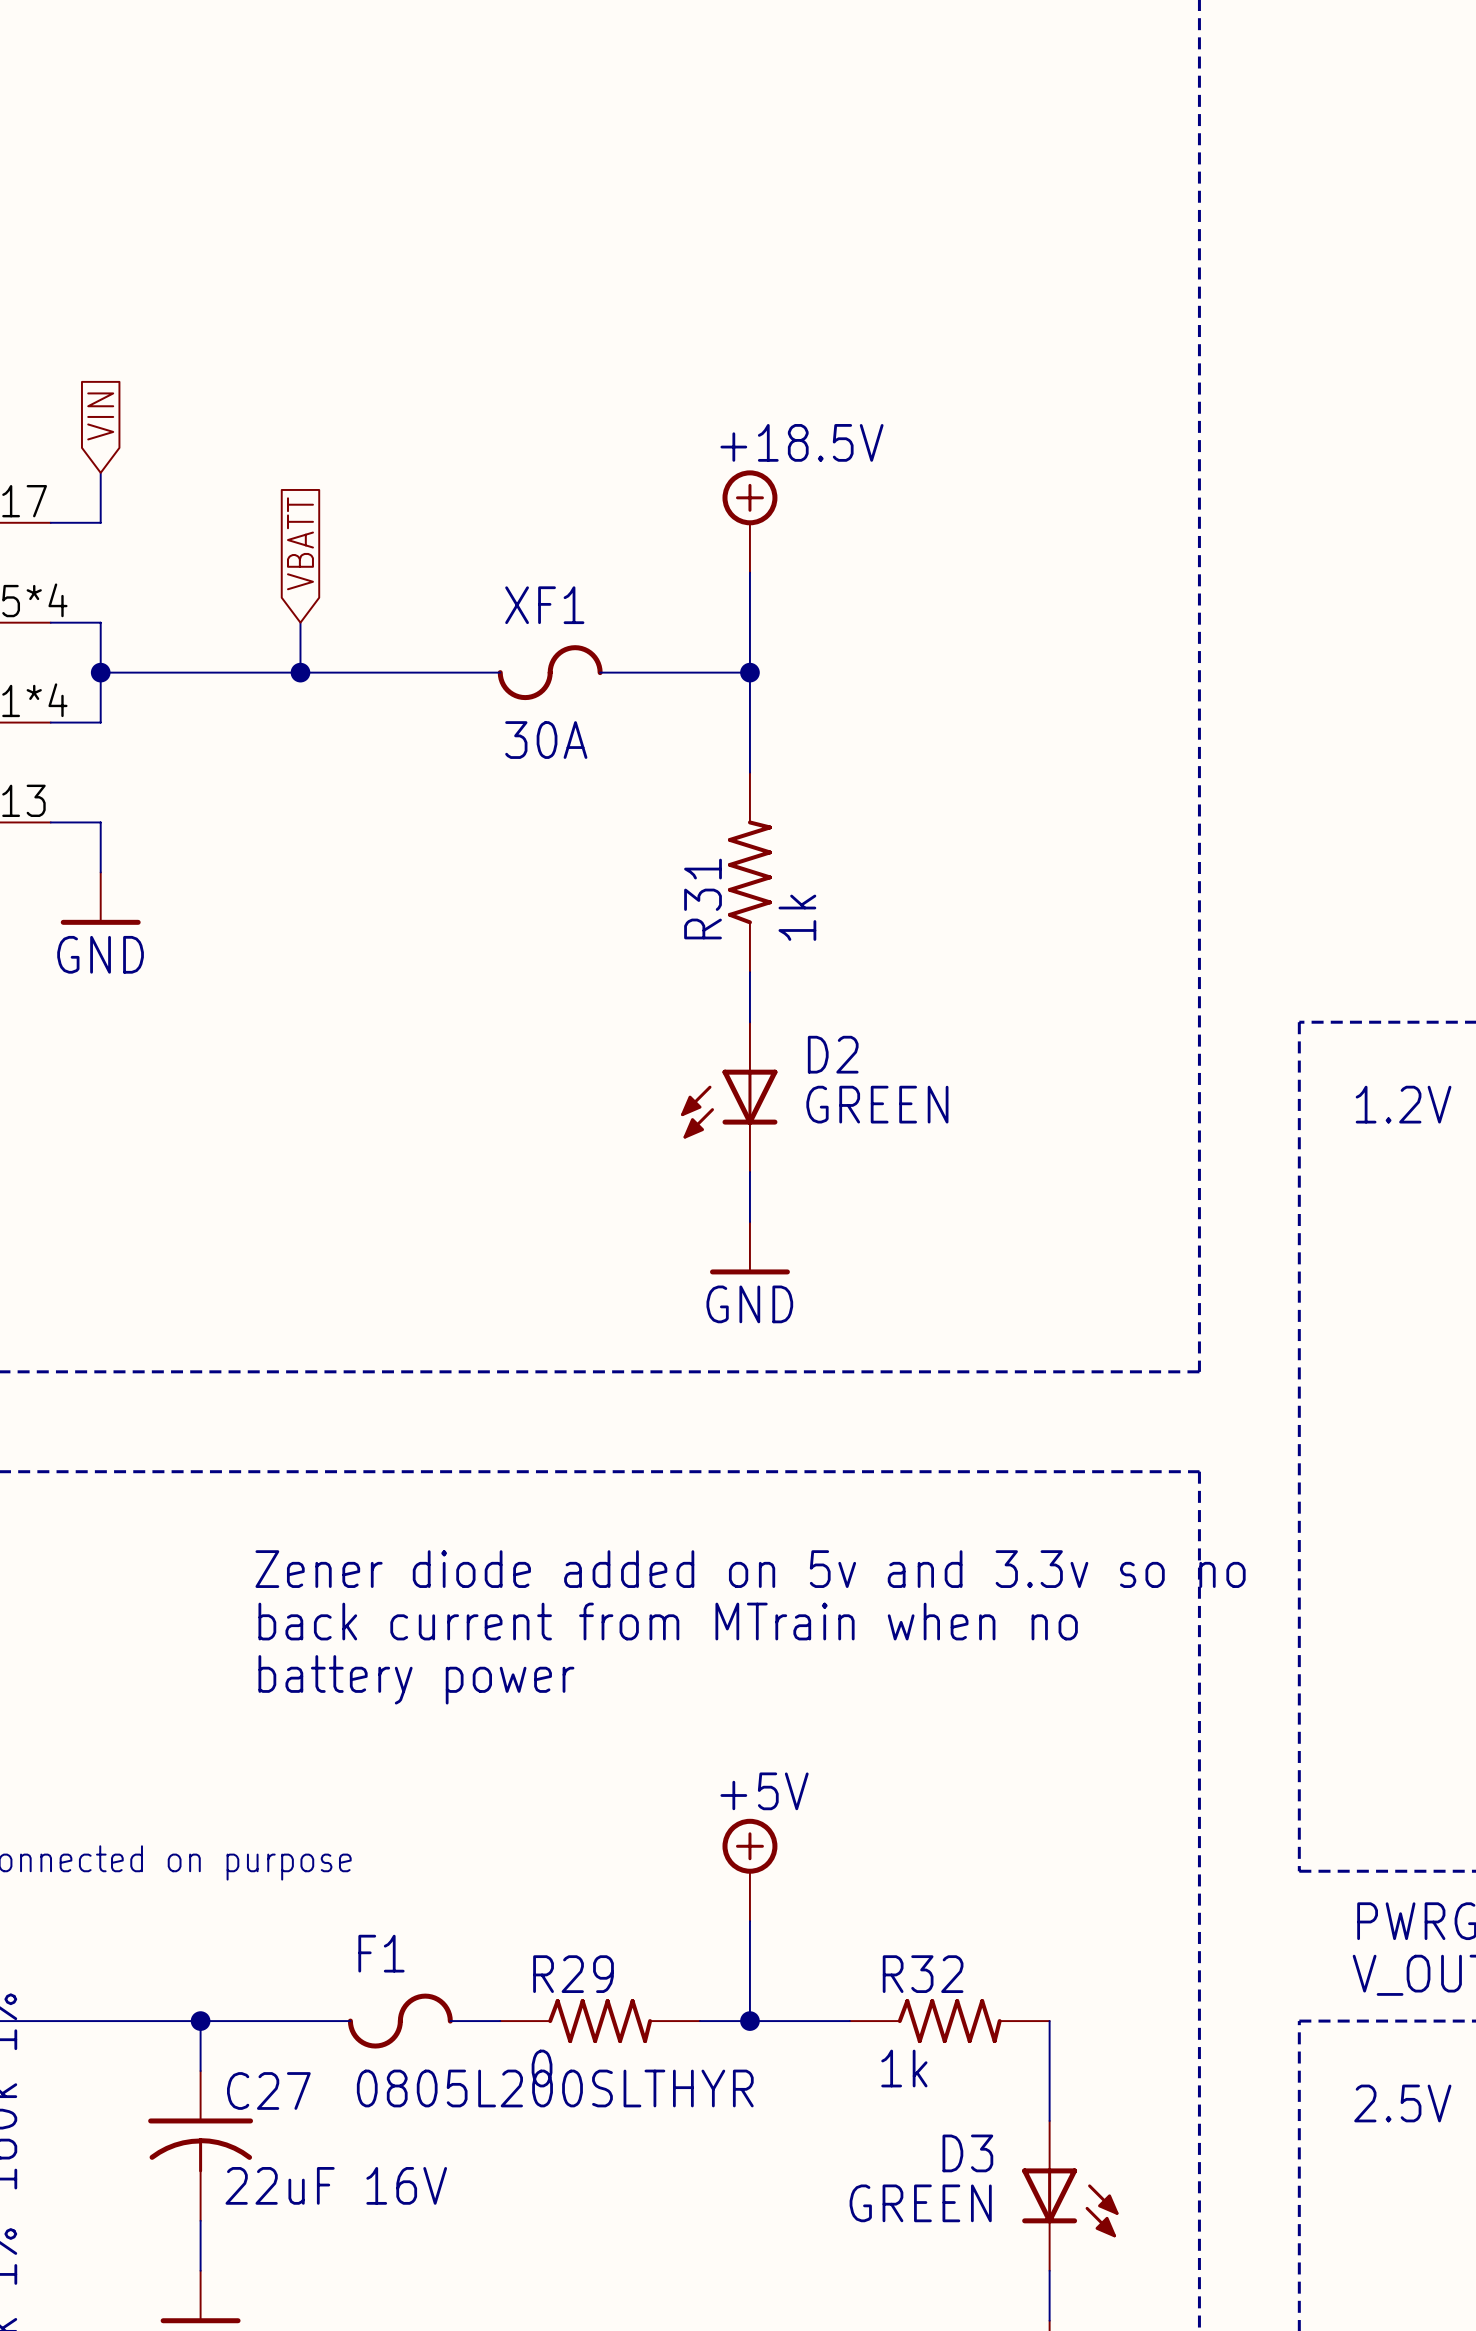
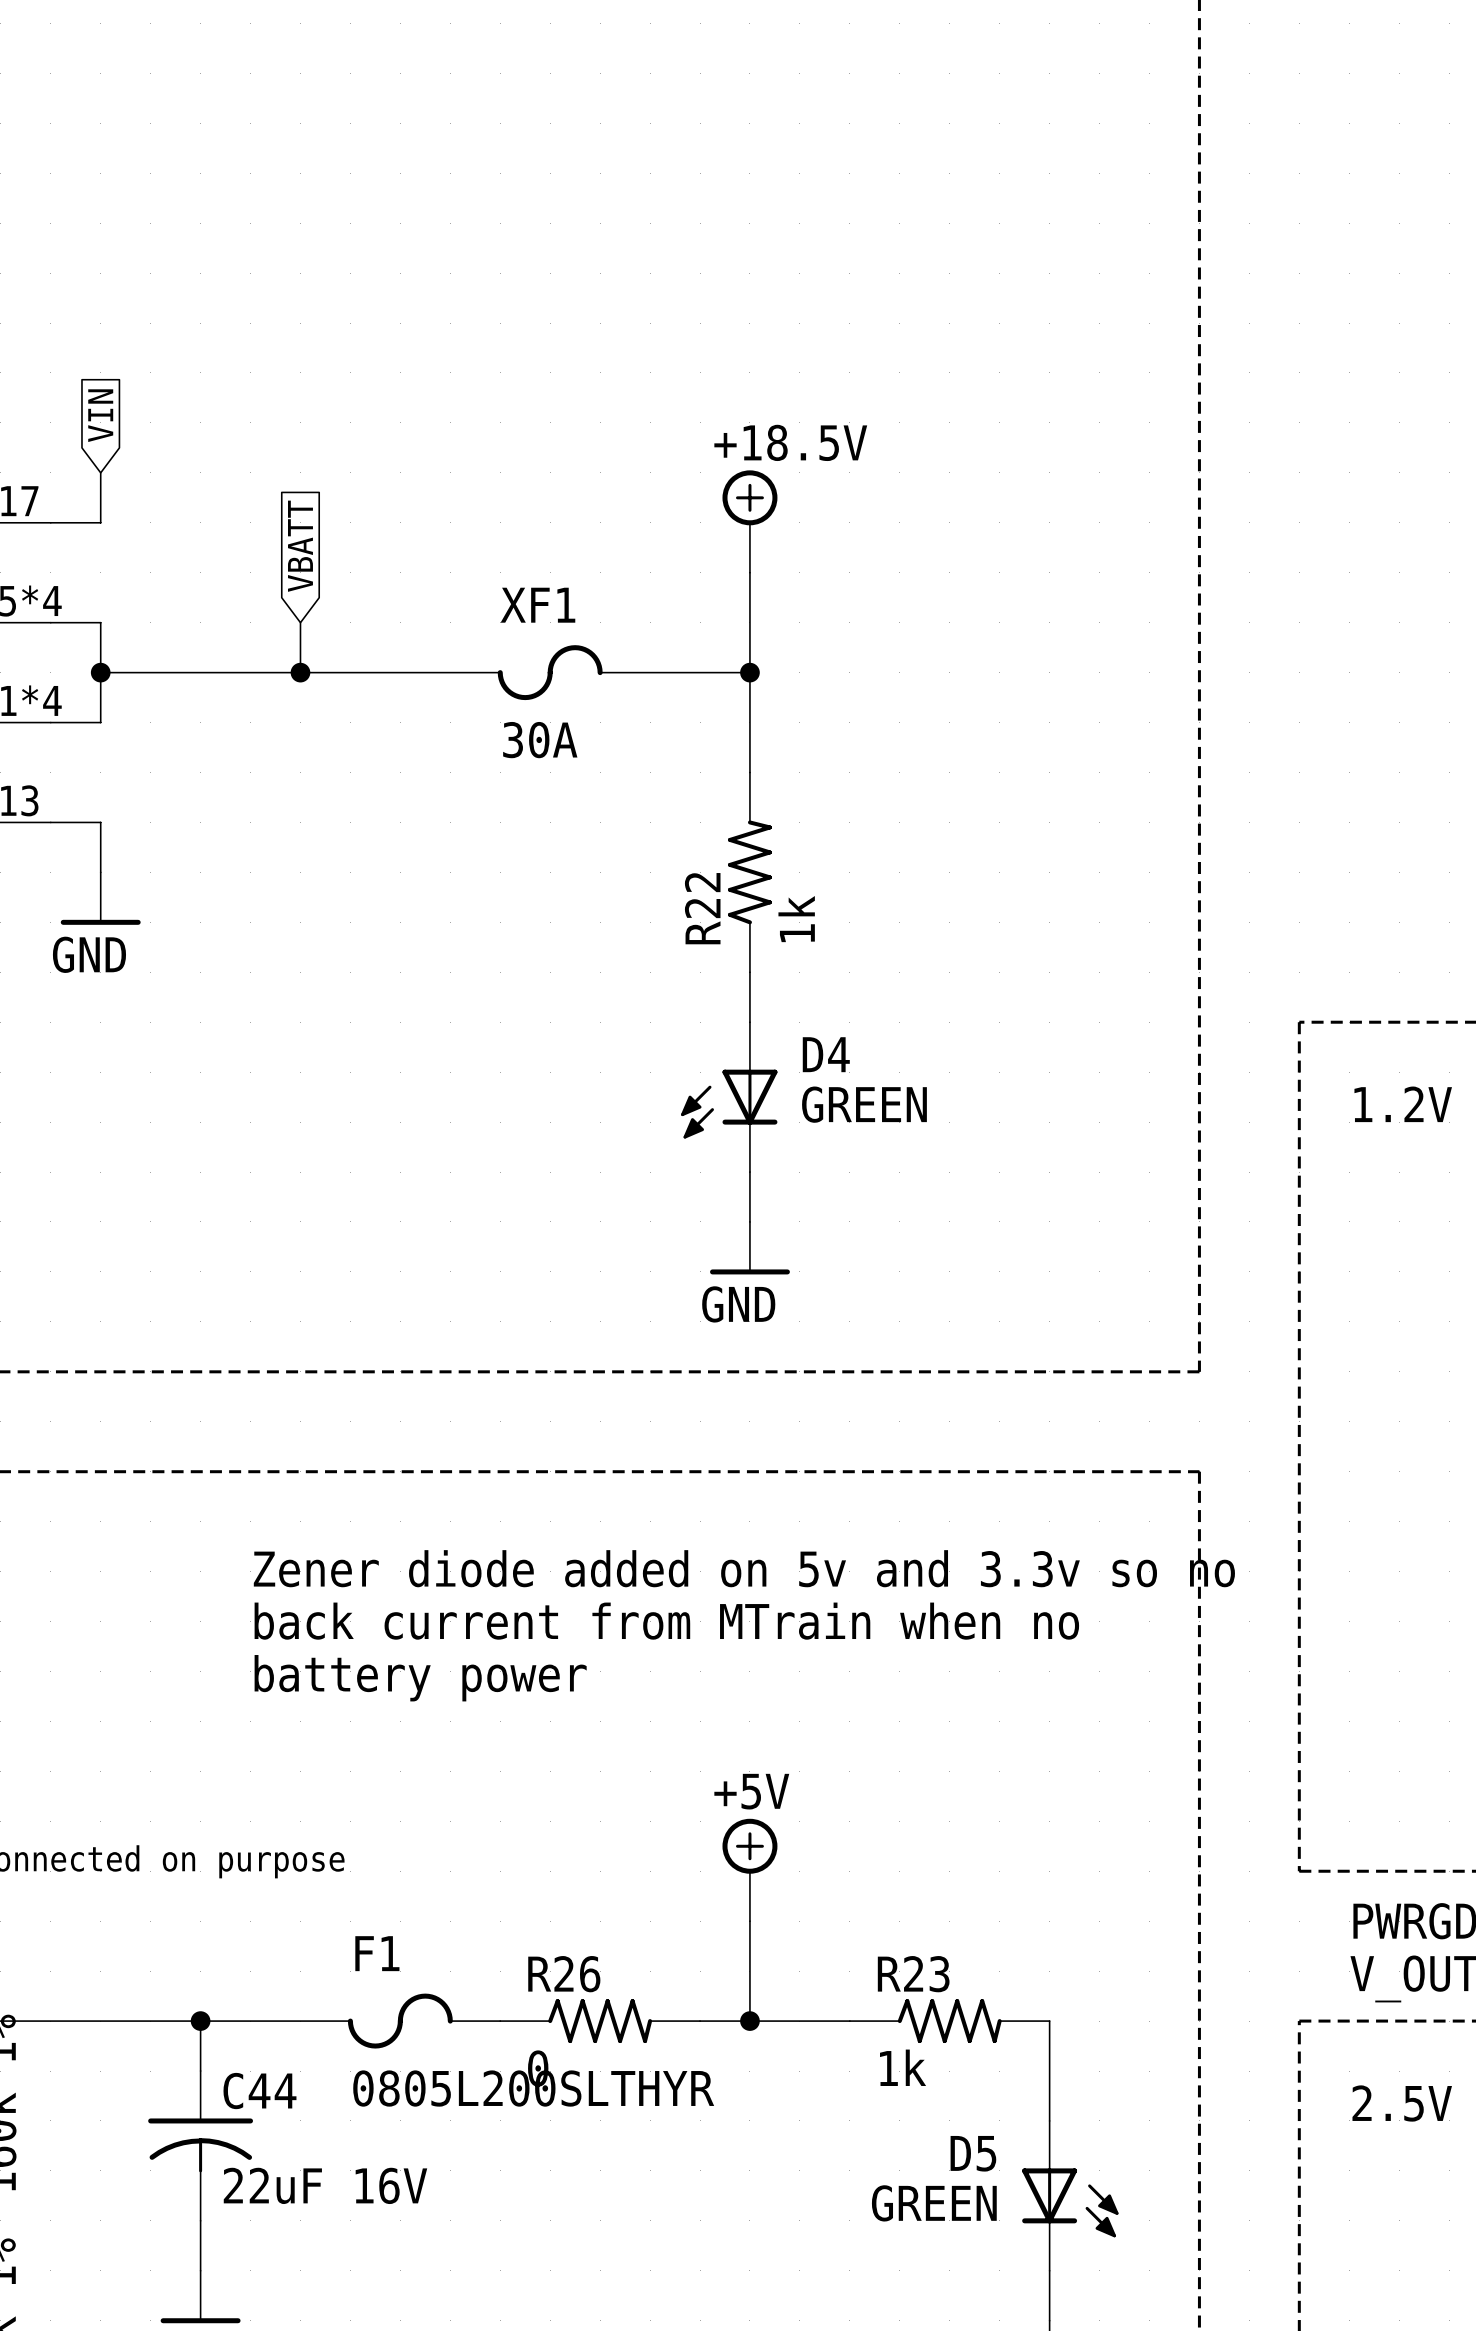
R31 name: R31 (703, 899) -> R22 (702, 908)
D2 name: D2 (833, 1054) -> D4 (826, 1054)
R29 name: R29 (573, 1974) -> R26 (564, 1974)
R32 name: R32 (923, 1974) -> R23 (913, 1974)
C27 name: C27 (268, 2090) -> C44 (259, 2091)
D3 name: D3 (967, 2153) -> D5 (973, 2153)

